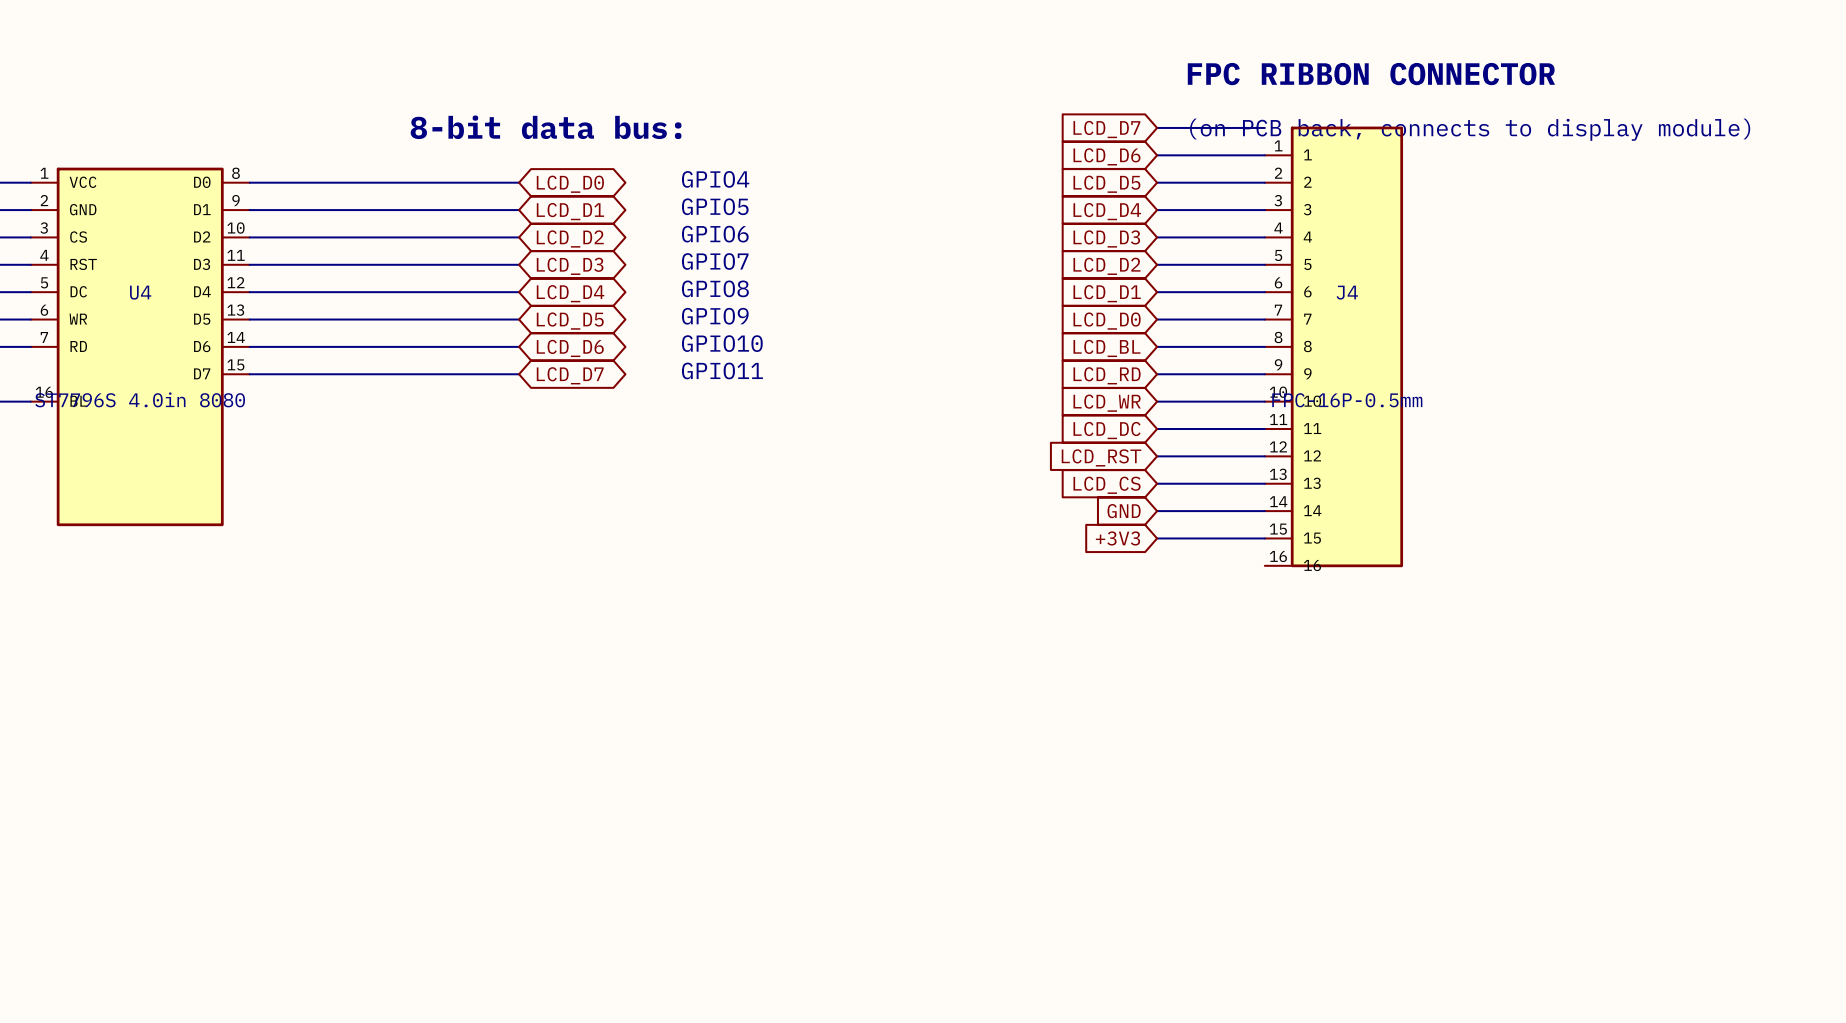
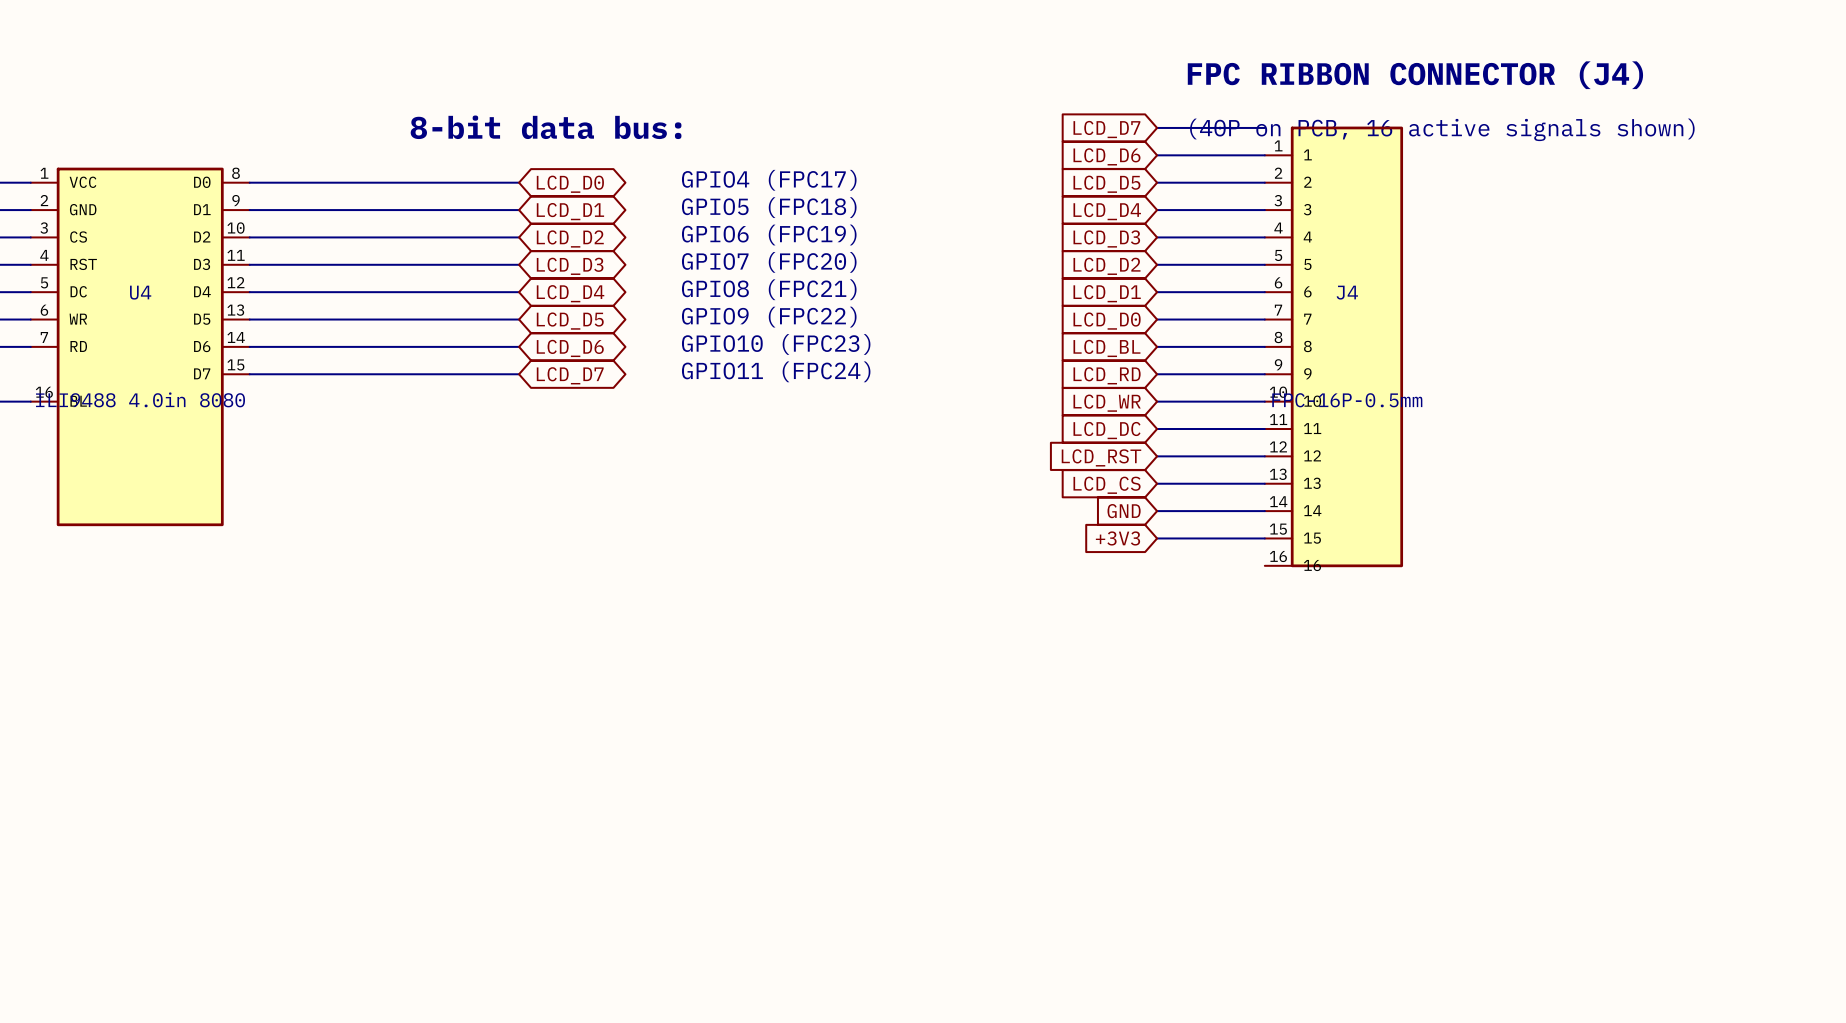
text: FPC RIBBON CONNECTOR (1371, 74) -> FPC RIBBON CONNECTOR (J4) (1415, 75)
text: (on PCB back, connects to display module) (1470, 129) -> (40P on PCB, 16 active signals shown) (1442, 129)
text: GPIO4 (715, 179) -> GPIO4 (FPC17) (769, 180)
text: GPIO5 (715, 206) -> GPIO5 (FPC18) (769, 207)
text: GPIO6 (715, 234) -> GPIO6 (FPC19) (769, 235)
text: GPIO7 (715, 261) -> GPIO7 (FPC20) (769, 262)
text: GPIO8 (715, 288) -> GPIO8 (FPC21) (769, 289)
text: GPIO9 (715, 316) -> GPIO9 (FPC22) (769, 317)
text: GPIO10 (722, 343) -> GPIO10 (FPC23) (776, 344)
text: GPIO11 (722, 370) -> GPIO11 (FPC24) (776, 371)
U4 value: ST7796S 4.0in 8080 (140, 399) -> ILI9488 4.0in 8080 (140, 399)

